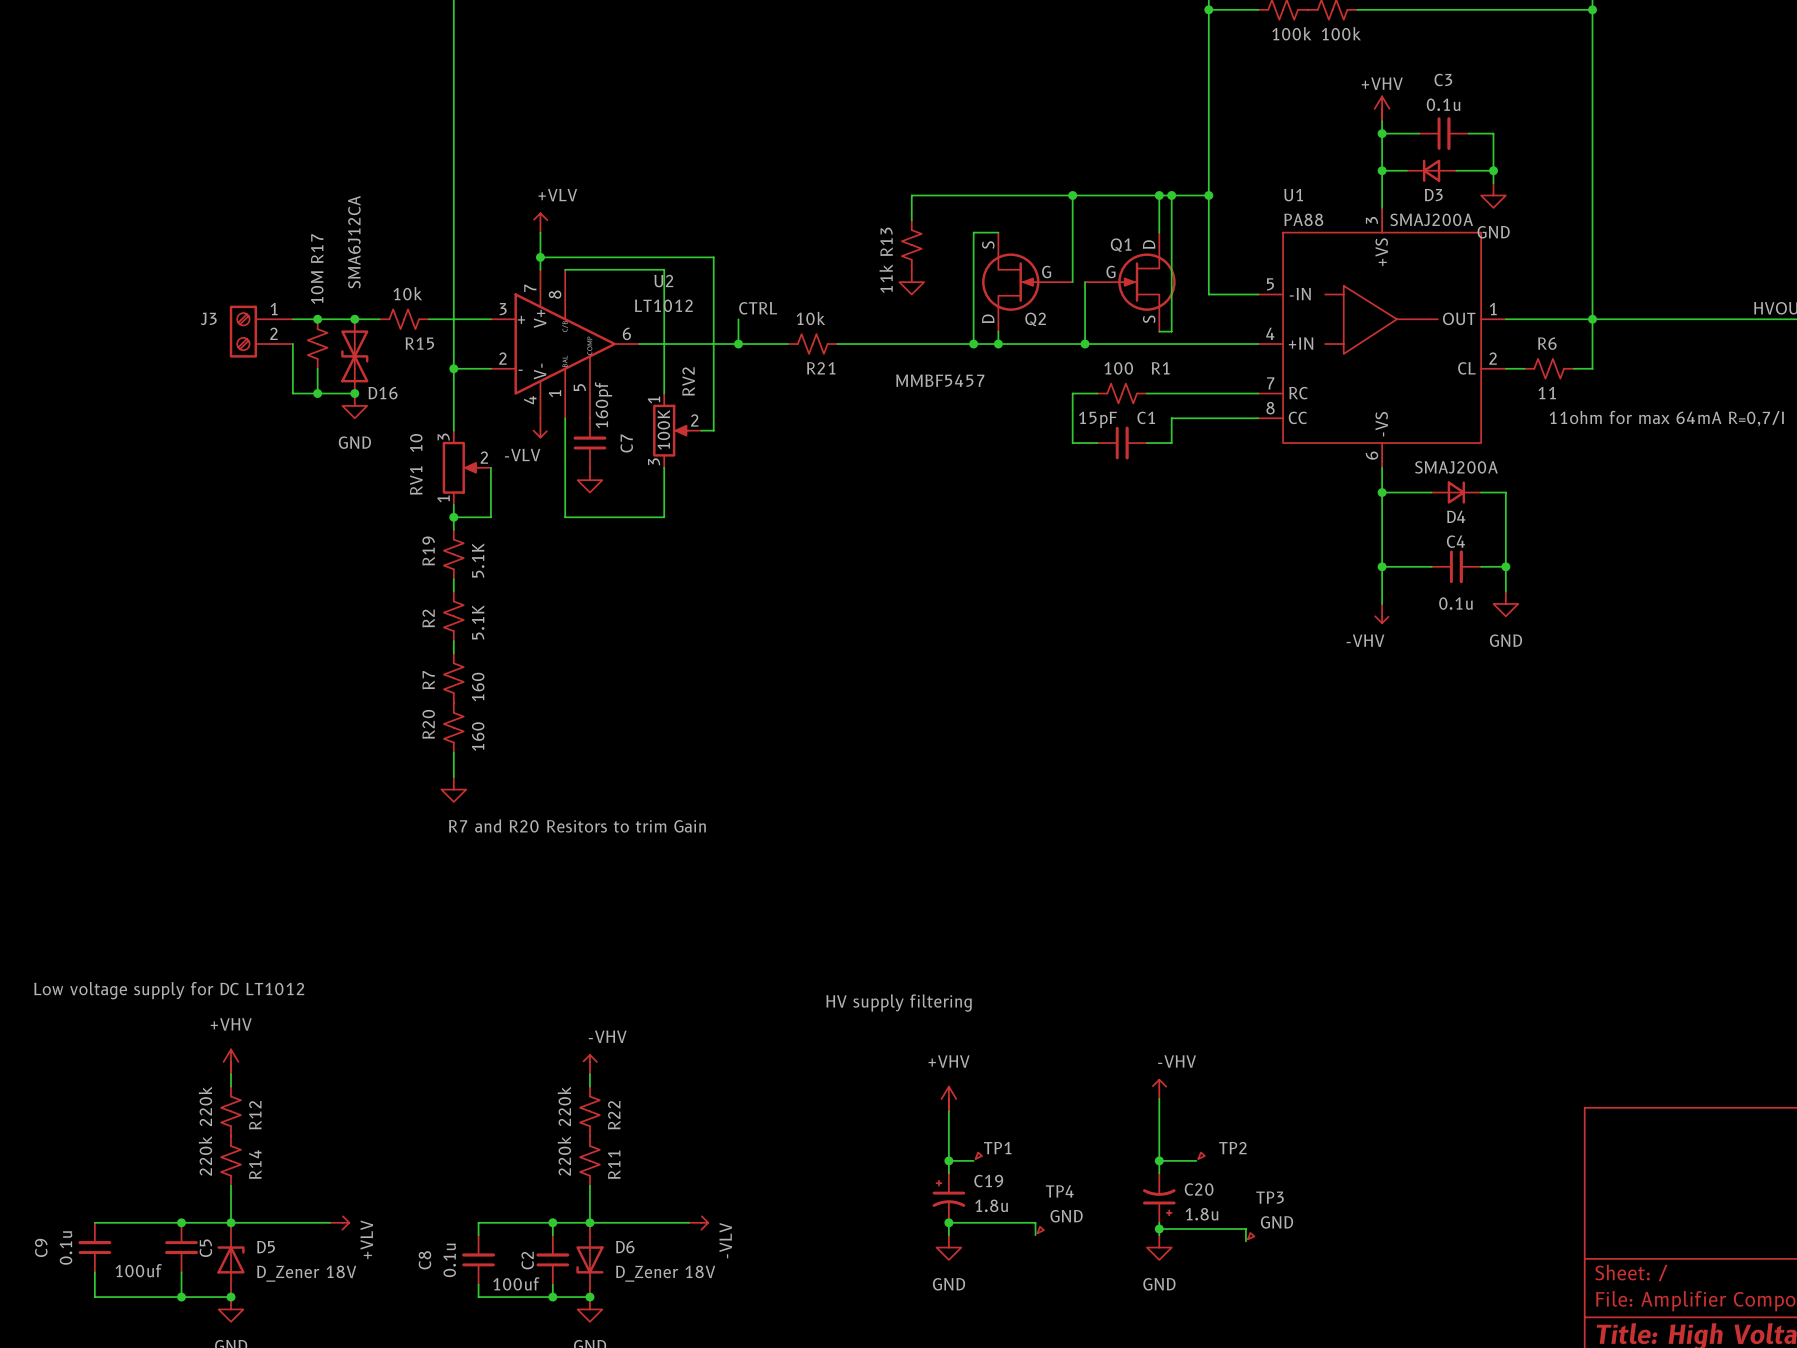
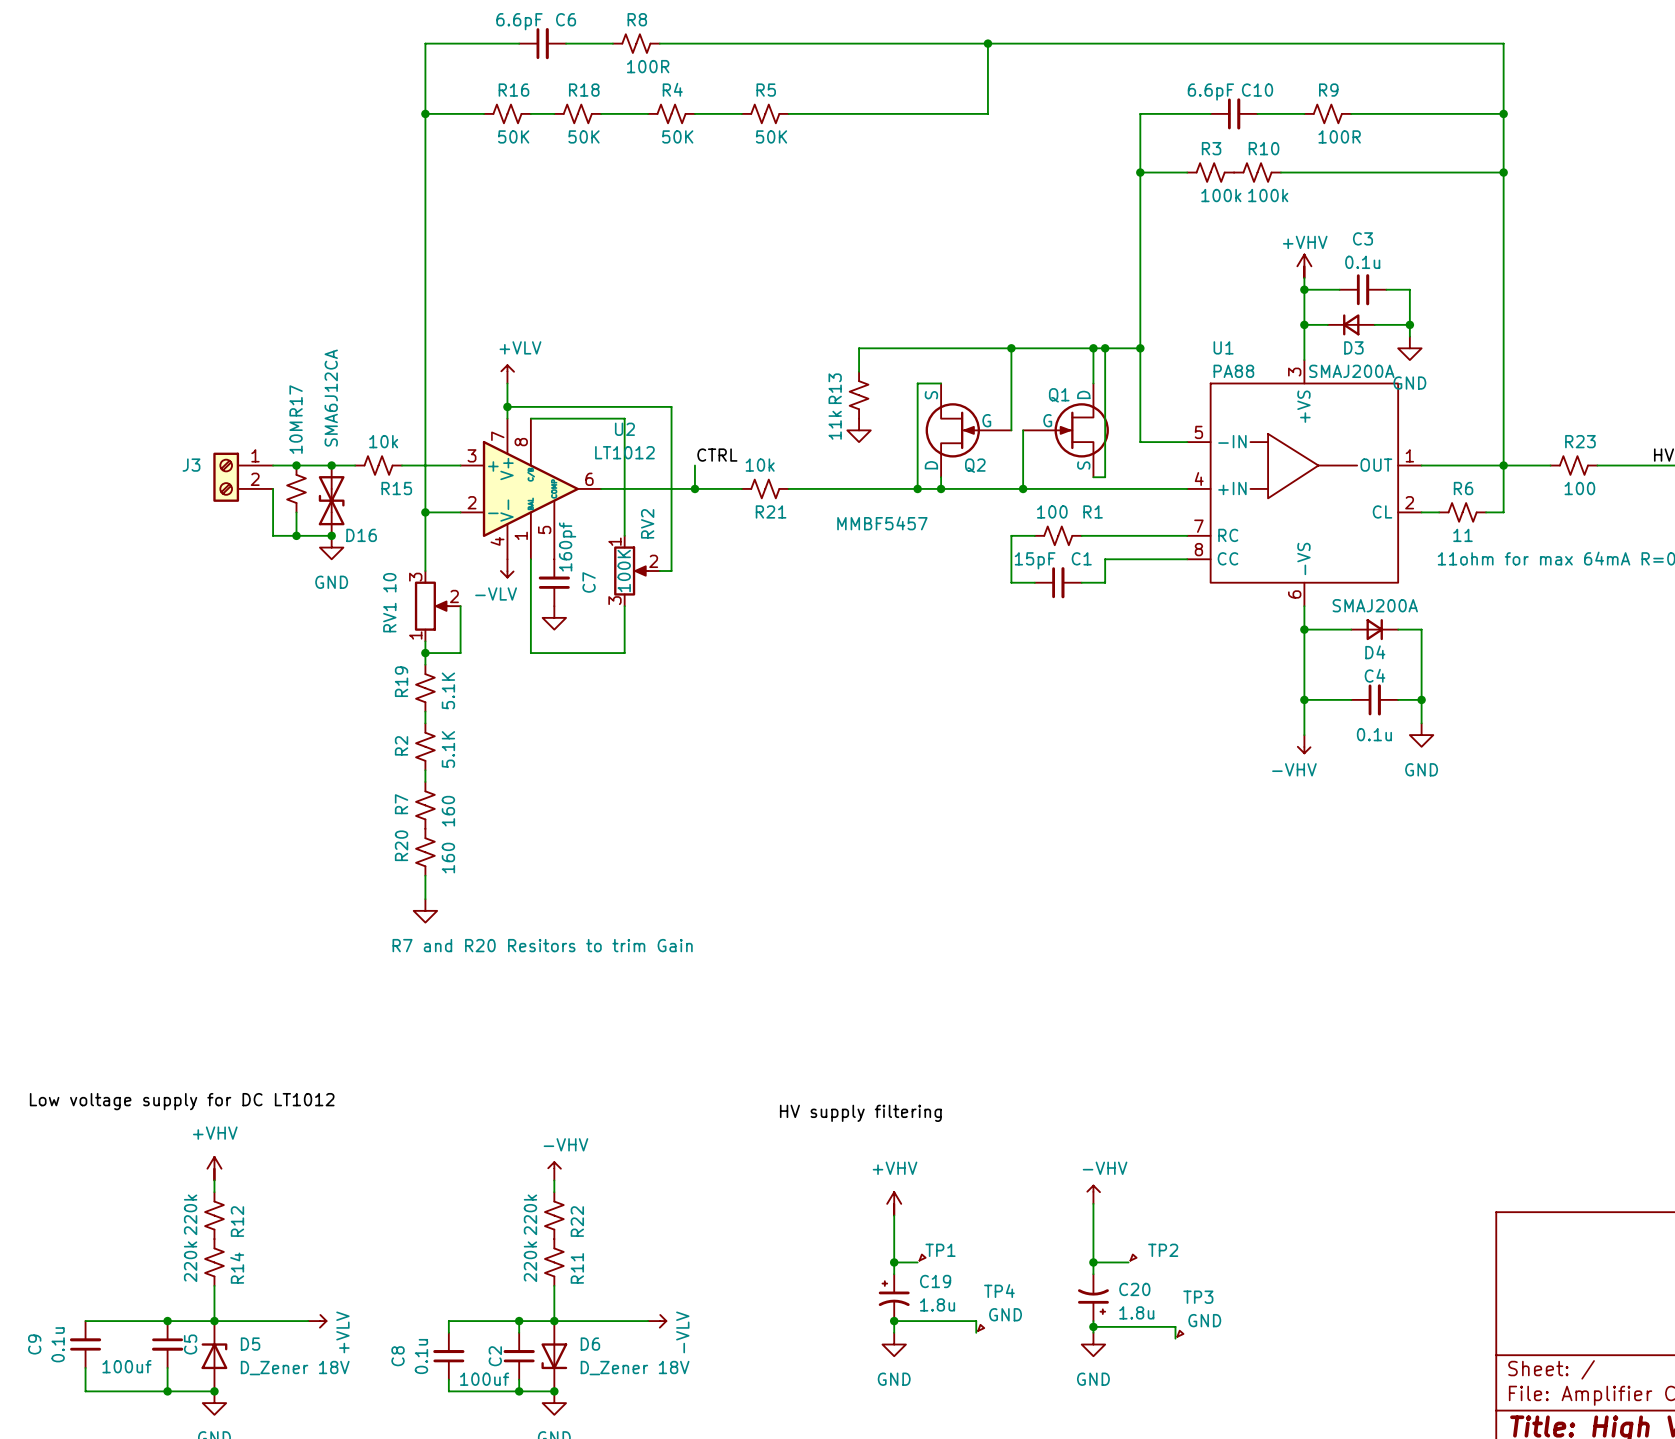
R23: none -> 100 (1573, 465)

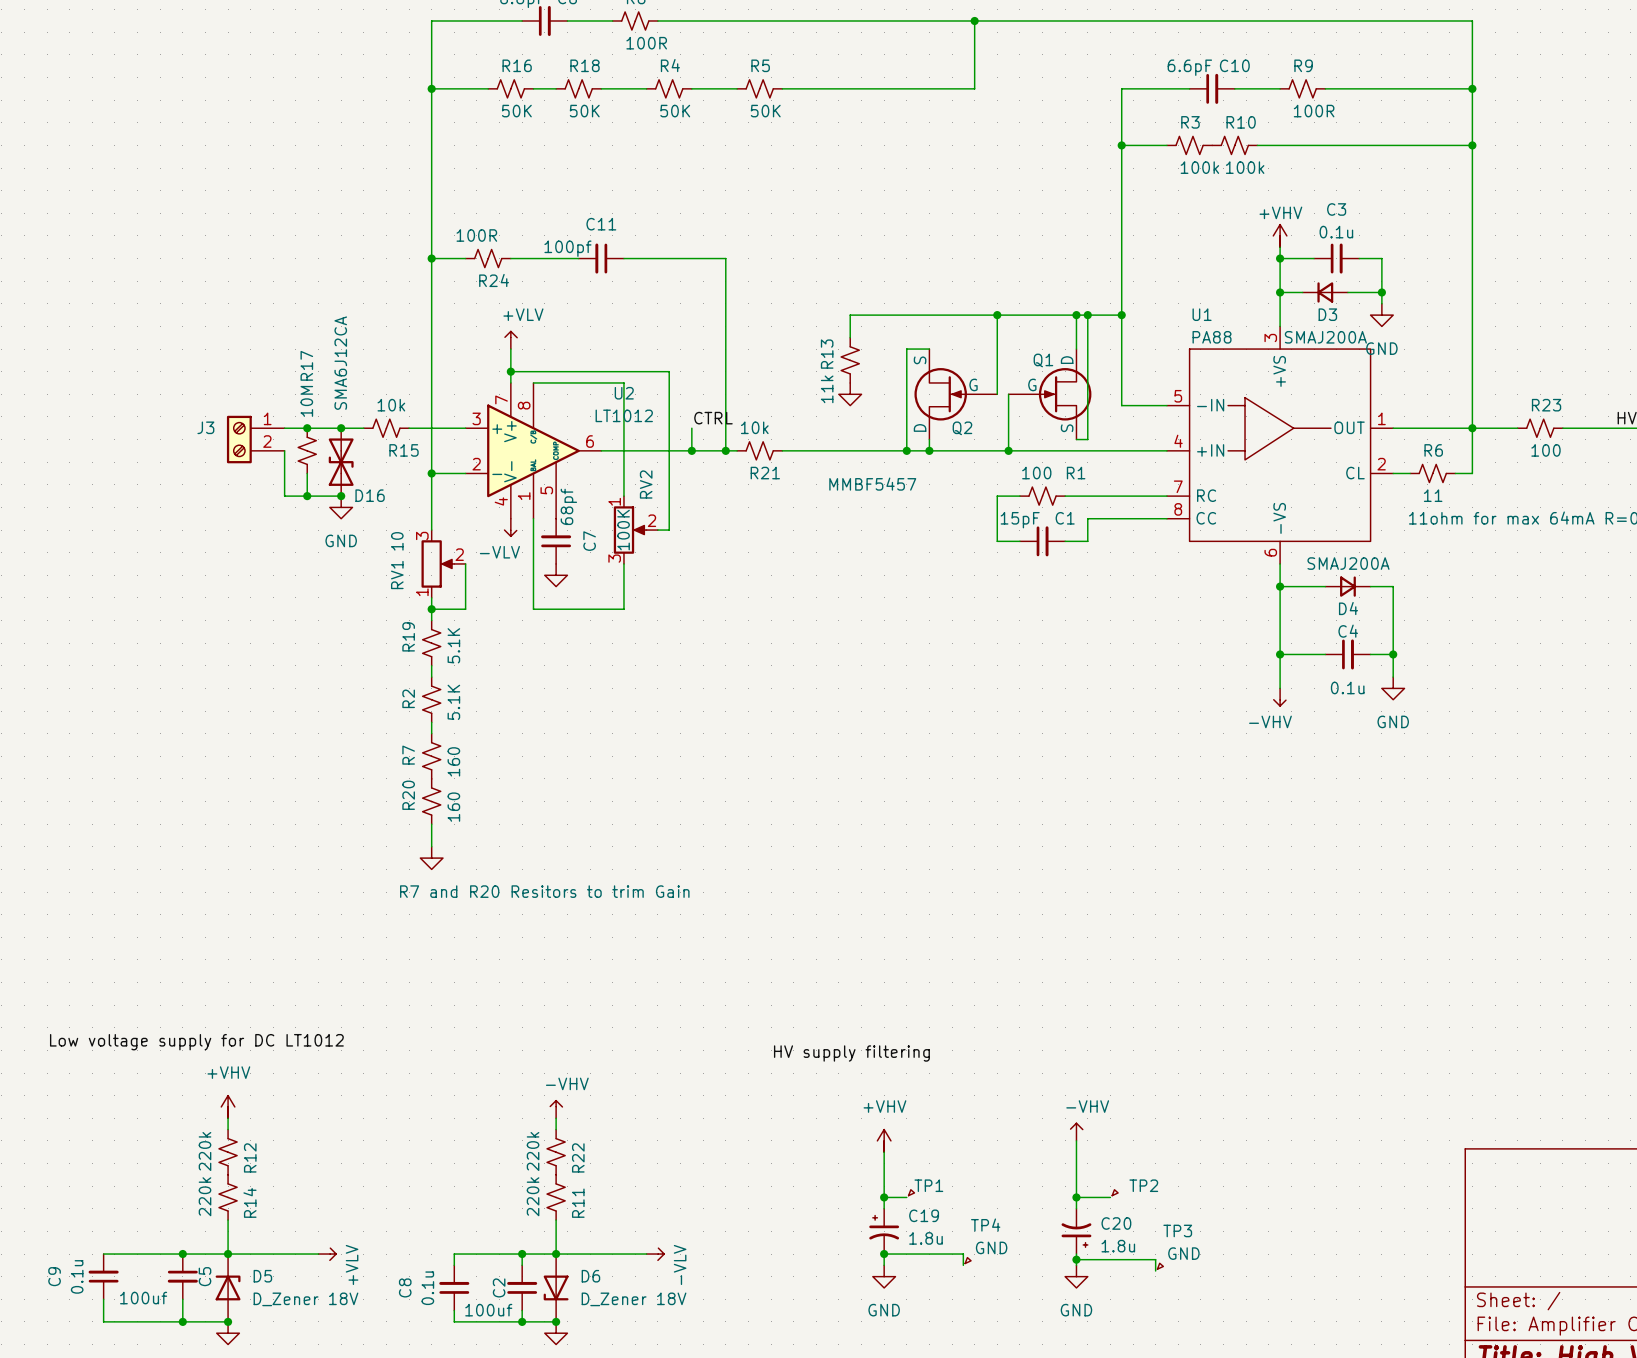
wire: none -> (431, 258) (465, 258)
junction: none -> (431, 258)
R24: none -> 100R (488, 258)
wire: none -> (510, 258) (578, 258)
C11: none -> 100pf (601, 258)
wire: none -> (623, 258) (725, 258) (725, 450)
junction: none -> (725, 450)
C7 value: 160pf (567, 547) -> 68pf (568, 506)

